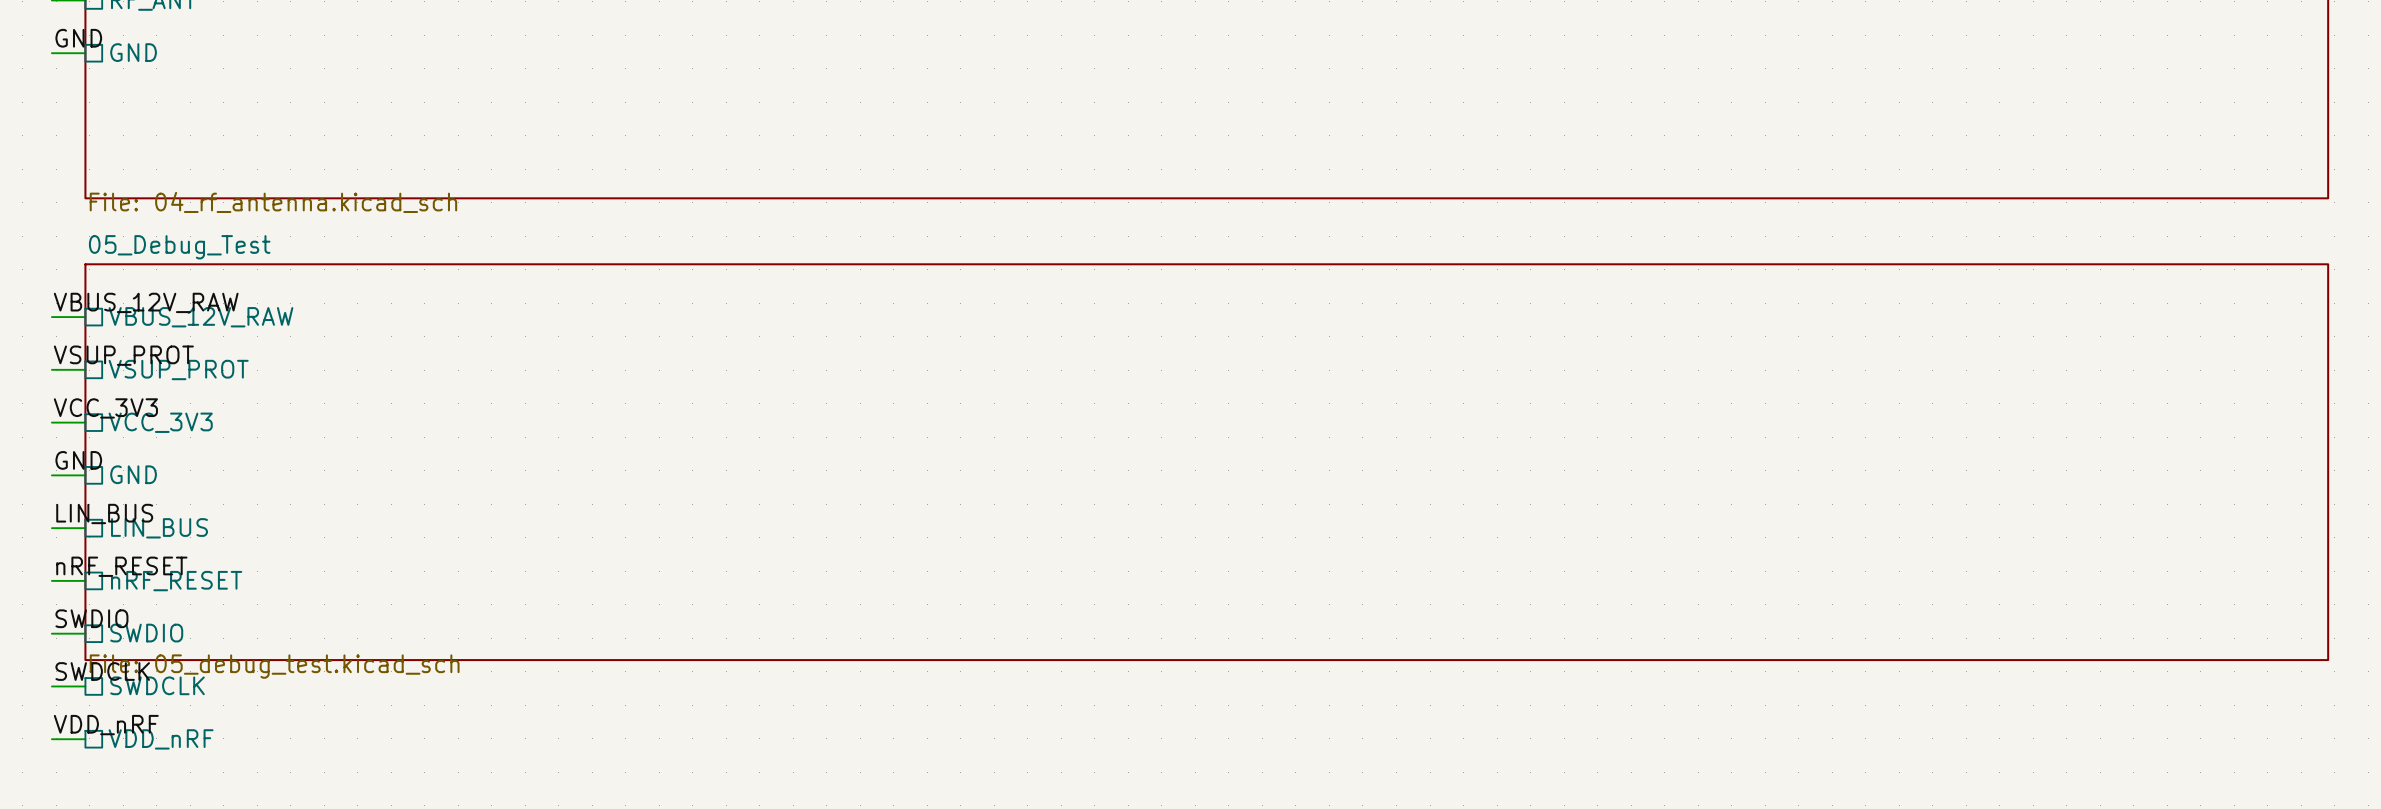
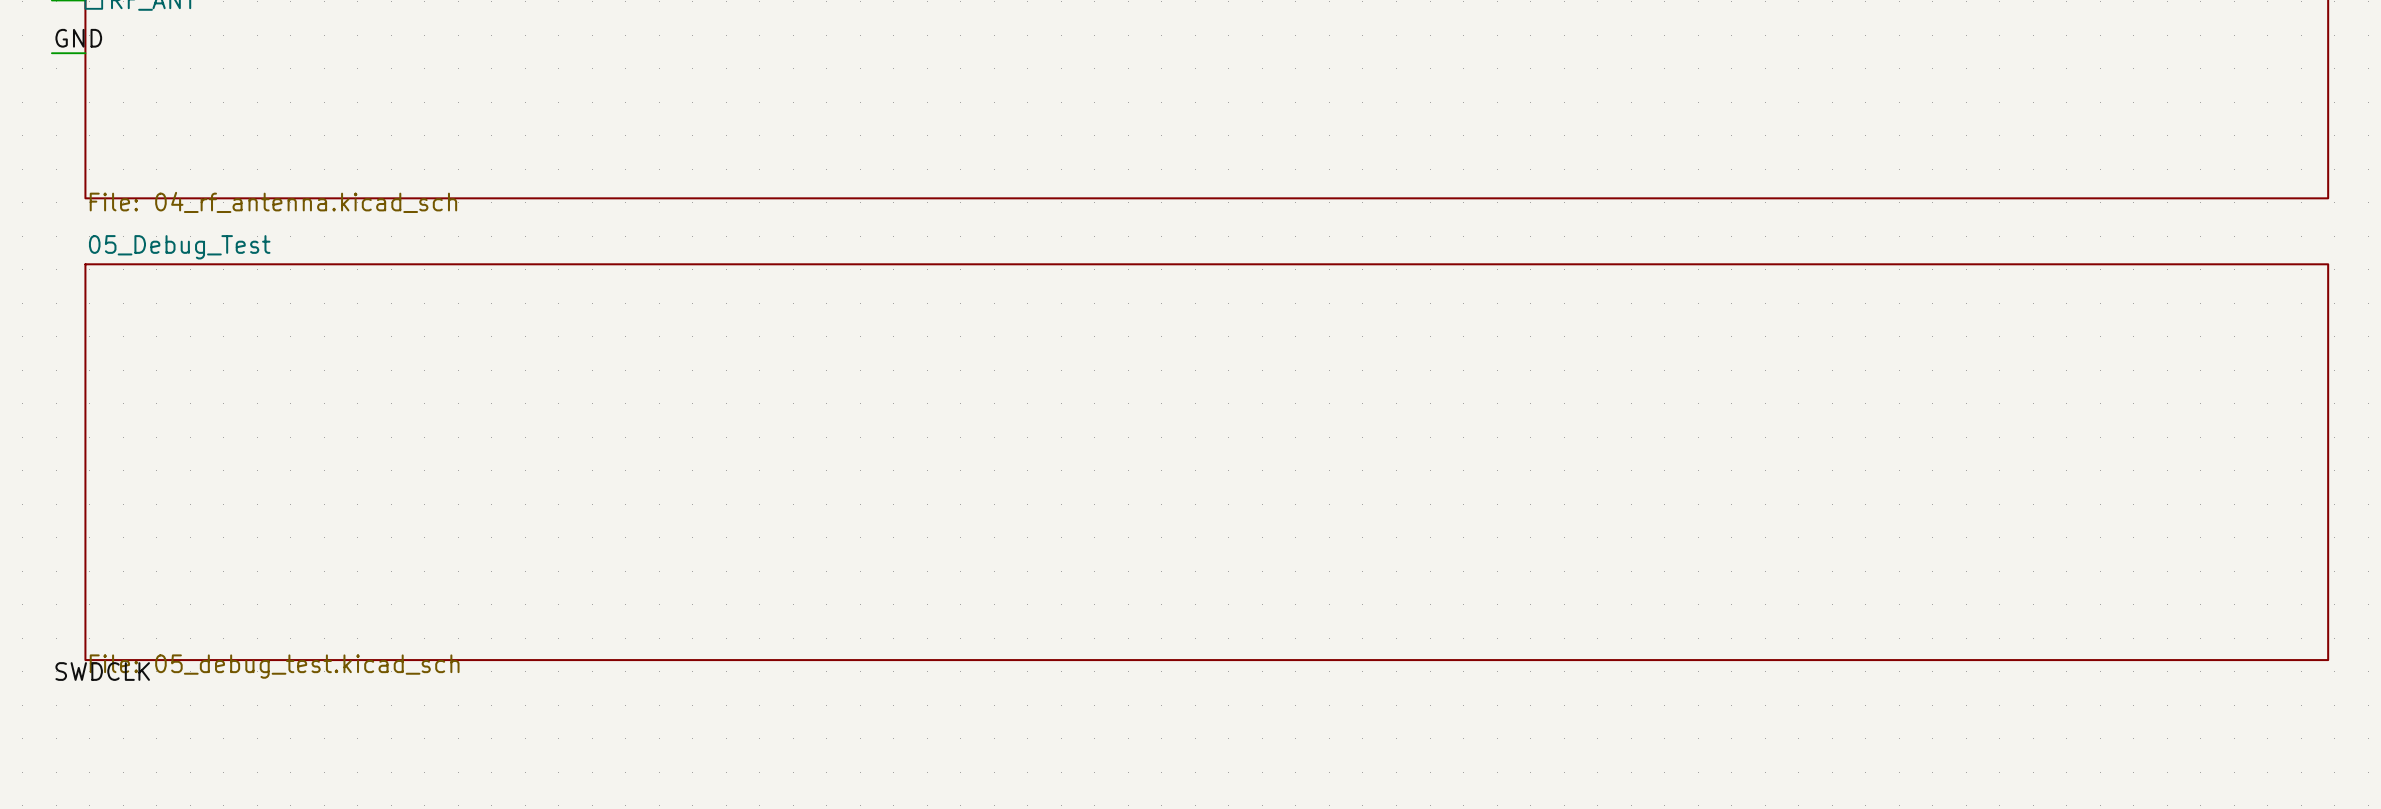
sheet pin: GND (133, 52) -> none
label: VBUS_12V_RAW (146, 302) -> none
wire: (51, 317) (85, 317) -> none
sheet pin: VBUS_12V_RAW (200, 317) -> none
label: VSUP_PROT (123, 355) -> none
wire: (51, 369) (85, 369) -> none
sheet pin: VSUP_PROT (178, 370) -> none
label: VCC_3V3 (105, 408) -> none
wire: (51, 422) (85, 422) -> none
sheet pin: VCC_3V3 (160, 422) -> none
label: GND (78, 460) -> none
sheet pin: GND (133, 474) -> none
wire: (51, 475) (85, 475) -> none
label: LIN_BUS (104, 513) -> none
wire: (51, 528) (85, 528) -> none
sheet pin: LIN_BUS (159, 528) -> none
label: nRF_RESET (121, 566) -> none
wire: (51, 580) (85, 580) -> none
sheet pin: nRF_RESET (176, 581) -> none
label: SWDIO (91, 618) -> none
wire: (51, 633) (85, 633) -> none
sheet pin: SWDIO (146, 633) -> none
sheet pin: SWDCLK (157, 685) -> none
wire: (51, 686) (85, 686) -> none
label: VDD_nRF (106, 725) -> none
wire: (51, 739) (85, 739) -> none
sheet pin: VDD_nRF (161, 739) -> none

